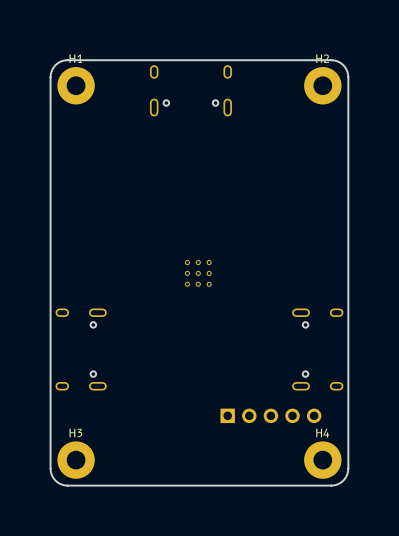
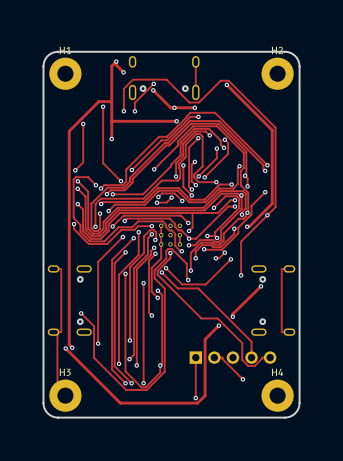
via: none -> (116, 61)
track: none -> (195, 61) (195, 92)
track: none -> (123, 72) (116, 65) (116, 61) (111, 66) (111, 139)
via: none -> (123, 72)
track: none -> (153, 83) (134, 102) (134, 111)
via: none -> (153, 83)
track: none -> (226, 84) (272, 130) (272, 203) (247, 226)
via: none -> (226, 84)
track: none -> (153, 90) (170, 107) (194, 107)
via: none -> (153, 90)
track: none -> (111, 101) (98, 101) (69, 131) (69, 344) (72, 347)
track: none -> (103, 106) (103, 163) (121, 181)
via: none -> (103, 106)
via: none -> (174, 107)
via: none -> (194, 107)
track: none -> (123, 111) (123, 88) (132, 79) (166, 79) (189, 102) (198, 102) (220, 80) (228, 80) (275, 127) (275, 207) (241, 241) (241, 275)
via: none -> (123, 111)
via: none -> (134, 111)
track: none -> (198, 116) (190, 116) (167, 140) (161, 140) (131, 170)
via: none -> (198, 116)
track: none -> (111, 121) (176, 121)
via: none -> (176, 121)
track: none -> (83, 123) (83, 162) (75, 170)
via: none -> (83, 123)
track: none -> (209, 135) (205, 131) (195, 131) (183, 143) (183, 156) (176, 163) (176, 176)
via: none -> (209, 135)
track: none -> (198, 138) (189, 147) (189, 186) (191, 189)
via: none -> (198, 138)
via: none -> (111, 139)
track: none -> (224, 139) (228, 142) (228, 154) (204, 177)
via: none -> (224, 139)
track: none -> (223, 147) (220, 144) (220, 140) (209, 128) (194, 128) (180, 142) (180, 155) (142, 194) (112, 194)
via: none -> (223, 147)
track: none -> (216, 148) (216, 158) (198, 176)
via: none -> (216, 148)
track: none -> (194, 161) (191, 165) (191, 181) (195, 185)
via: none -> (194, 161)
track: none -> (183, 165) (183, 186) (191, 195)
via: none -> (183, 165)
track: none -> (267, 165) (215, 112) (190, 112) (166, 136) (159, 136) (126, 169) (126, 181) (122, 185) (104, 185) (100, 188)
via: none -> (267, 165)
track: none -> (239, 166) (237, 167) (237, 184) (233, 188) (219, 188) (205, 202) (189, 202) (177, 190) (158, 190) (144, 204) (114, 204) (108, 211)
via: none -> (239, 166)
track: none -> (154, 169) (178, 145) (178, 141) (193, 126) (217, 126) (243, 152) (240, 185) (248, 192) (248, 212) (243, 218) (238, 218) (223, 233) (223, 240) (219, 244) (201, 242) (190, 252) (190, 270)
via: none -> (154, 169)
via: none -> (131, 170)
via: none -> (75, 170)
track: none -> (265, 170) (263, 165) (219, 121) (190, 121) (130, 177) (130, 181) (123, 187) (107, 187) (91, 203) (91, 228) (94, 231) (100, 228) (100, 213)
via: none -> (265, 170)
via: none -> (245, 175)
via: none -> (176, 176)
via: none -> (198, 176)
via: none -> (204, 177)
track: none -> (77, 181) (88, 191) (88, 228) (93, 233) (98, 233) (103, 228) (103, 221) (117, 207) (203, 207) (220, 191) (242, 191) (245, 193) (245, 208) (241, 214)
via: none -> (77, 181)
via: none -> (121, 181)
track: none -> (216, 182) (198, 182) (194, 177) (194, 174) (202, 166) (202, 136) (196, 134) (185, 144) (185, 157) (179, 163) (180, 178) (177, 180) (161, 180) (143, 198) (100, 198) (95, 203) (95, 226)
via: none -> (216, 182)
track: none -> (231, 184) (219, 184) (204, 199) (190, 199) (178, 188) (157, 188) (143, 202) (103, 202) (101, 204)
via: none -> (231, 184)
track: none -> (95, 185) (87, 177) (75, 177) (73, 179) (73, 218) (80, 224) (80, 231) (89, 241) (104, 241) (118, 227) (132, 227) (138, 221) (162, 221) (169, 230) (175, 233) (175, 245) (181, 251)
via: none -> (95, 185)
via: none -> (195, 185)
track: none -> (247, 186) (247, 178) (245, 175) (246, 151) (218, 123) (190, 123) (132, 178) (132, 182) (124, 190) (110, 190) (106, 194)
via: none -> (247, 186)
track: none -> (77, 188) (85, 196) (85, 229) (92, 236) (99, 236) (106, 229) (106, 223) (118, 210) (204, 210) (221, 193) (238, 193) (241, 197) (241, 209) (221, 229) (221, 239) (218, 242) (200, 240) (194, 245) (189, 245)
via: none -> (77, 188)
via: none -> (100, 188)
via: none -> (191, 189)
track: none -> (265, 192) (251, 205) (251, 214) (238, 227) (238, 233) (221, 249) (204, 249)
via: none -> (265, 192)
via: none -> (106, 194)
via: none -> (112, 194)
via: none -> (191, 195)
via: none -> (241, 195)
track: none -> (158, 196) (161, 193) (174, 193) (182, 200)
via: none -> (158, 196)
track: none -> (171, 197) (166, 202) (156, 202)
via: none -> (171, 197)
track: none -> (234, 200) (230, 200) (217, 212) (120, 212) (108, 224) (108, 230) (100, 238) (90, 238) (83, 230) (83, 209) (77, 204)
via: none -> (234, 200)
via: none -> (182, 200)
via: none -> (156, 202)
via: none -> (77, 204)
via: none -> (101, 204)
track: none -> (234, 206) (228, 206) (196, 238) (189, 238) (175, 226) (175, 224) (169, 218) (127, 218) (124, 220)
via: none -> (234, 206)
track: none -> (213, 207) (225, 196) (236, 196) (239, 198) (239, 208) (215, 232) (215, 235)
via: none -> (213, 207)
via: none -> (108, 211)
track: none -> (192, 212) (192, 227) (189, 230)
via: none -> (247, 212)
via: none -> (100, 213)
via: none -> (241, 214)
via: none -> (267, 215)
via: none -> (124, 220)
track: none -> (188, 222) (181, 215) (123, 215) (112, 226)
via: none -> (188, 222)
track: none -> (74, 224) (74, 229) (88, 243) (107, 243) (121, 229) (134, 229) (138, 226) (151, 226)
via: none -> (74, 224)
track: none -> (161, 225) (161, 258) (151, 267) (151, 291) (157, 297)
via: none -> (95, 226)
via: none -> (112, 226)
via: none -> (151, 226)
via: none -> (247, 226)
track: none -> (234, 228) (234, 233) (220, 247) (202, 245) (195, 251) (195, 258)
via: none -> (234, 228)
via: none -> (189, 230)
track: none -> (138, 232) (138, 254) (119, 274) (119, 363)
via: none -> (138, 232)
track: none -> (151, 234) (147, 238) (147, 254) (134, 268) (134, 354) (129, 359)
via: none -> (151, 234)
track: none -> (179, 235) (179, 244)
track: none -> (207, 235) (215, 235)
via: none -> (207, 235)
track: none -> (122, 237) (98, 261) (98, 343)
via: none -> (122, 237)
via: none -> (217, 237)
track: none -> (133, 238) (112, 259) (112, 369) (125, 383)
via: none -> (133, 238)
via: none -> (189, 238)
track: none -> (155, 239) (156, 232) (150, 230) (144, 236) (144, 253) (129, 267) (129, 340)
via: none -> (155, 239)
via: none -> (189, 245)
track: none -> (154, 247) (151, 254) (136, 269) (136, 365)
via: none -> (154, 247)
via: none -> (204, 249)
via: none -> (181, 251)
track: none -> (125, 252) (114, 263) (114, 366) (131, 383)
via: none -> (125, 252)
track: none -> (224, 252) (219, 258) (215, 258)
via: none -> (224, 252)
track: none -> (170, 253) (170, 258) (157, 270) (157, 274) (201, 318) (217, 318) (242, 343) (242, 359) (248, 365) (254, 365) (262, 357) (270, 357)
via: none -> (170, 253)
track: none -> (155, 253) (149, 260) (149, 312) (151, 315)
via: none -> (155, 253)
via: none -> (195, 258)
via: none -> (215, 258)
track: none -> (230, 259) (205, 284) (182, 284) (166, 268)
via: none -> (230, 259)
via: none -> (166, 268)
track: none -> (53, 268) (61, 268) (61, 332) (53, 332)
track: none -> (289, 268) (281, 268) (281, 332) (289, 332)
via: none -> (190, 270)
track: none -> (161, 272) (177, 288) (198, 288) (251, 341) (251, 357)
via: none -> (161, 272)
track: none -> (125, 273) (125, 371) (141, 387) (145, 387) (160, 372) (162, 363) (162, 294) (157, 290)
via: none -> (125, 273)
via: none -> (241, 275)
track: none -> (188, 280) (186, 263) (172, 249) (168, 249) (166, 258) (154, 270) (154, 278) (164, 288) (164, 371) (146, 389) (126, 389) (94, 357) (94, 326) (81, 313)
via: none -> (188, 280)
track: none -> (143, 283) (143, 383)
via: none -> (143, 283)
track: none -> (261, 286) (232, 314) (232, 316)
via: none -> (261, 286)
via: none -> (157, 290)
via: none -> (157, 297)
via: none -> (81, 313)
via: none -> (151, 315)
via: none -> (232, 316)
track: none -> (218, 325) (205, 339) (205, 395) (197, 403) (120, 403) (65, 348)
via: none -> (218, 325)
track: none -> (57, 332) (57, 387) (65, 395)
via: none -> (129, 340)
via: none -> (98, 343)
via: none -> (72, 347)
via: none -> (65, 348)
track: none -> (195, 357) (195, 398)
track: none -> (214, 357) (222, 357) (242, 379)
via: none -> (129, 359)
via: none -> (119, 363)
via: none -> (136, 365)
via: none -> (160, 365)
via: none -> (242, 379)
via: none -> (125, 383)
via: none -> (131, 383)
via: none -> (143, 383)
via: none -> (195, 398)

